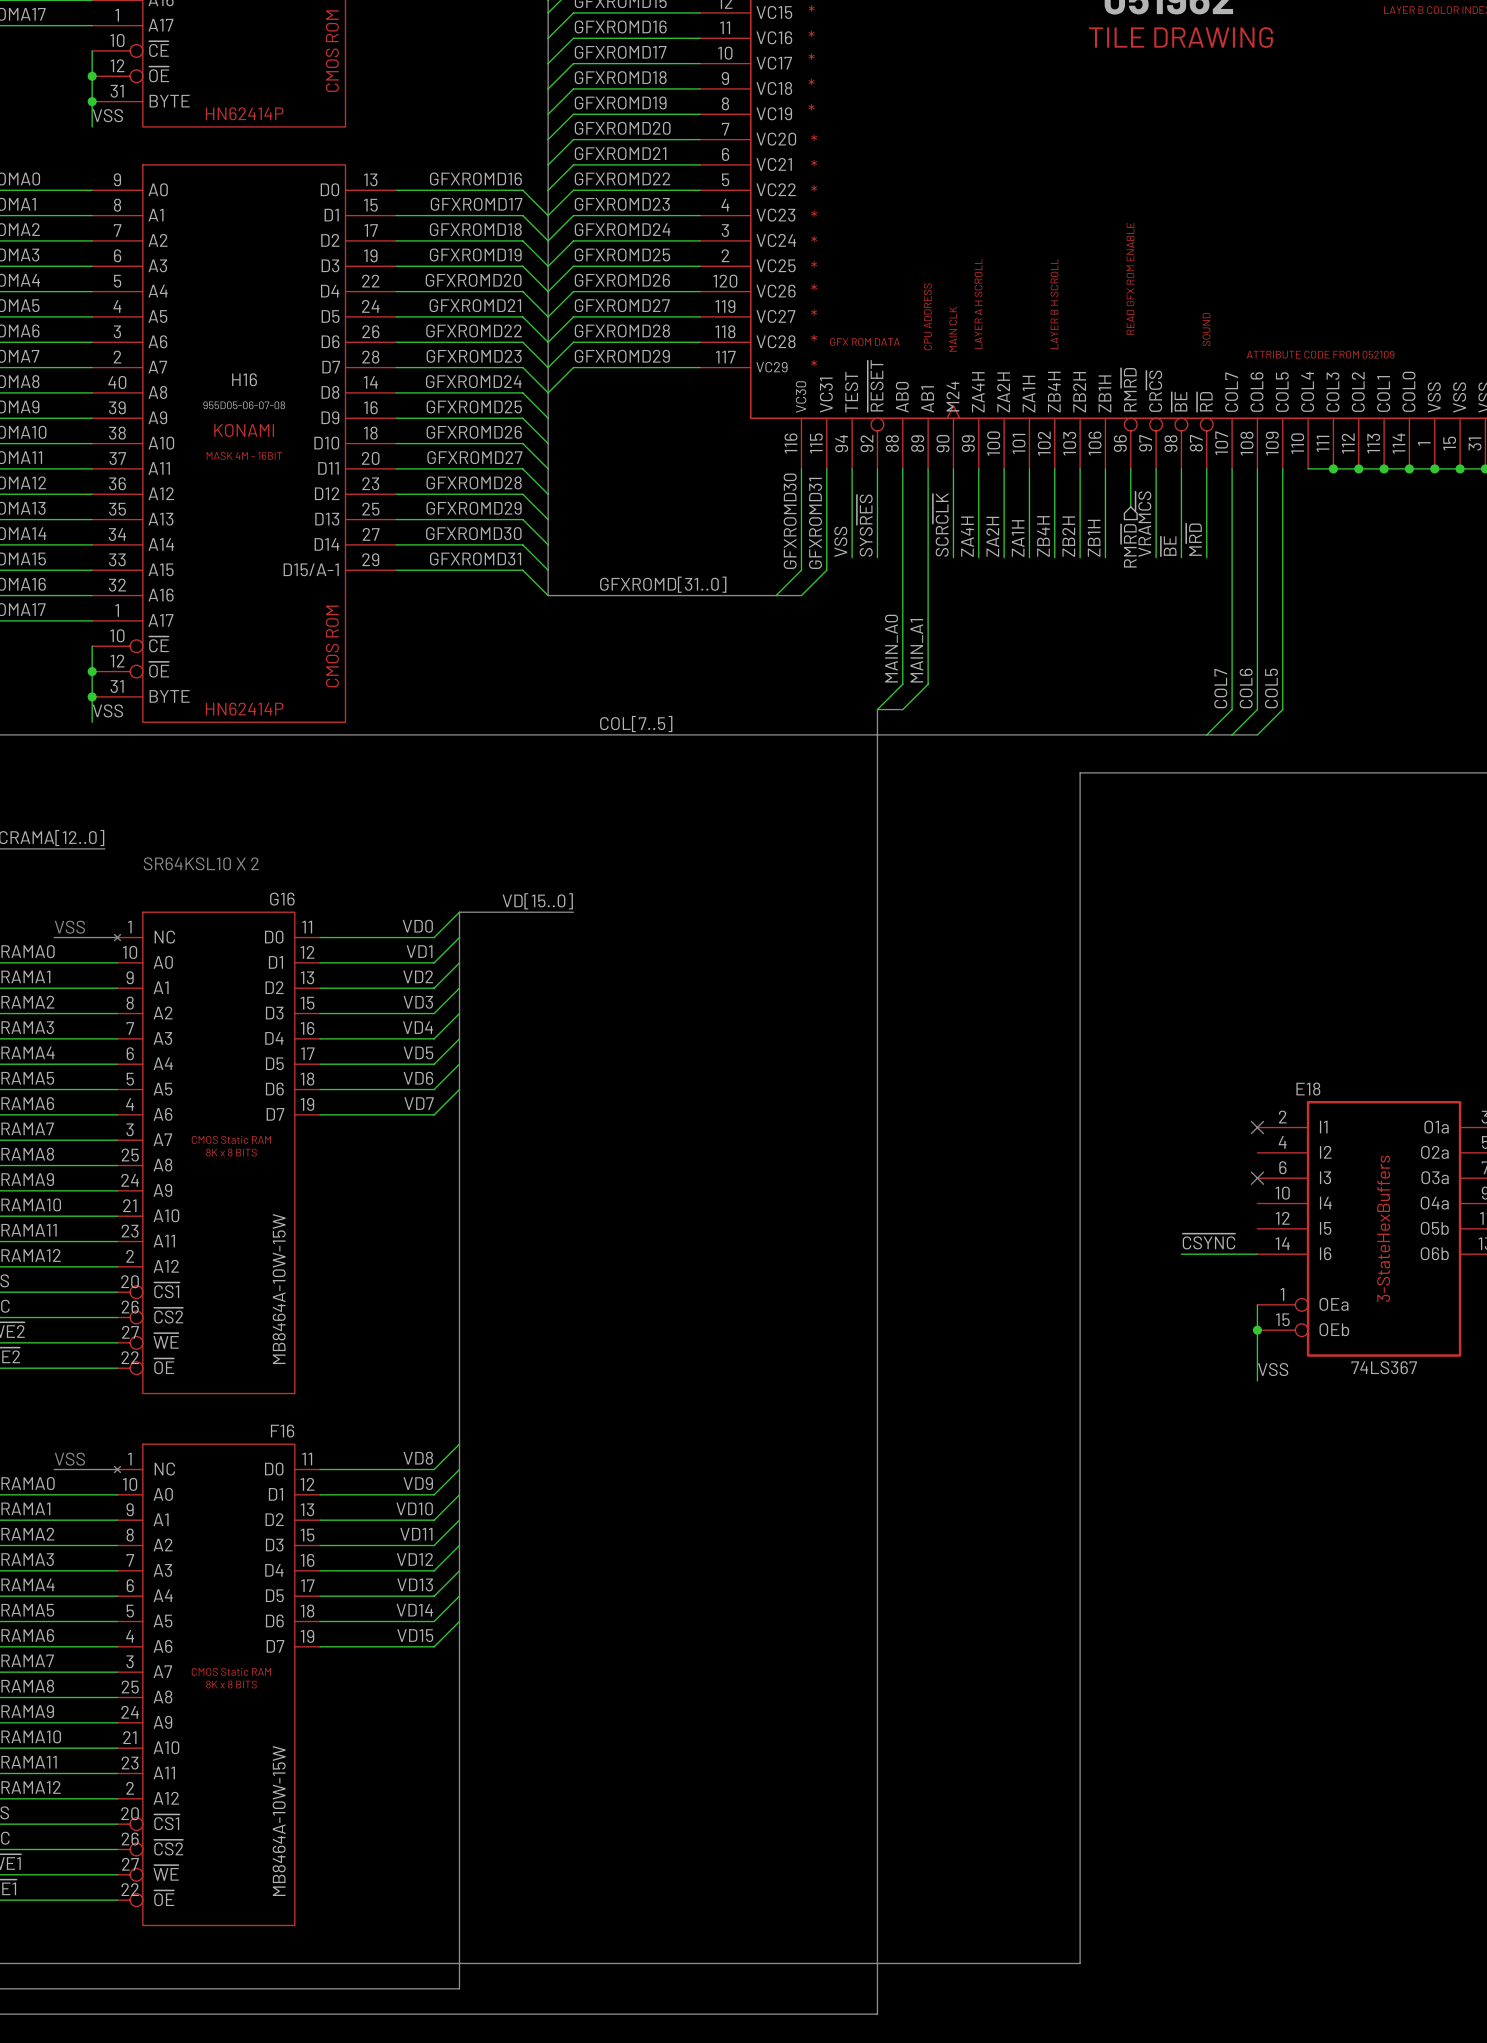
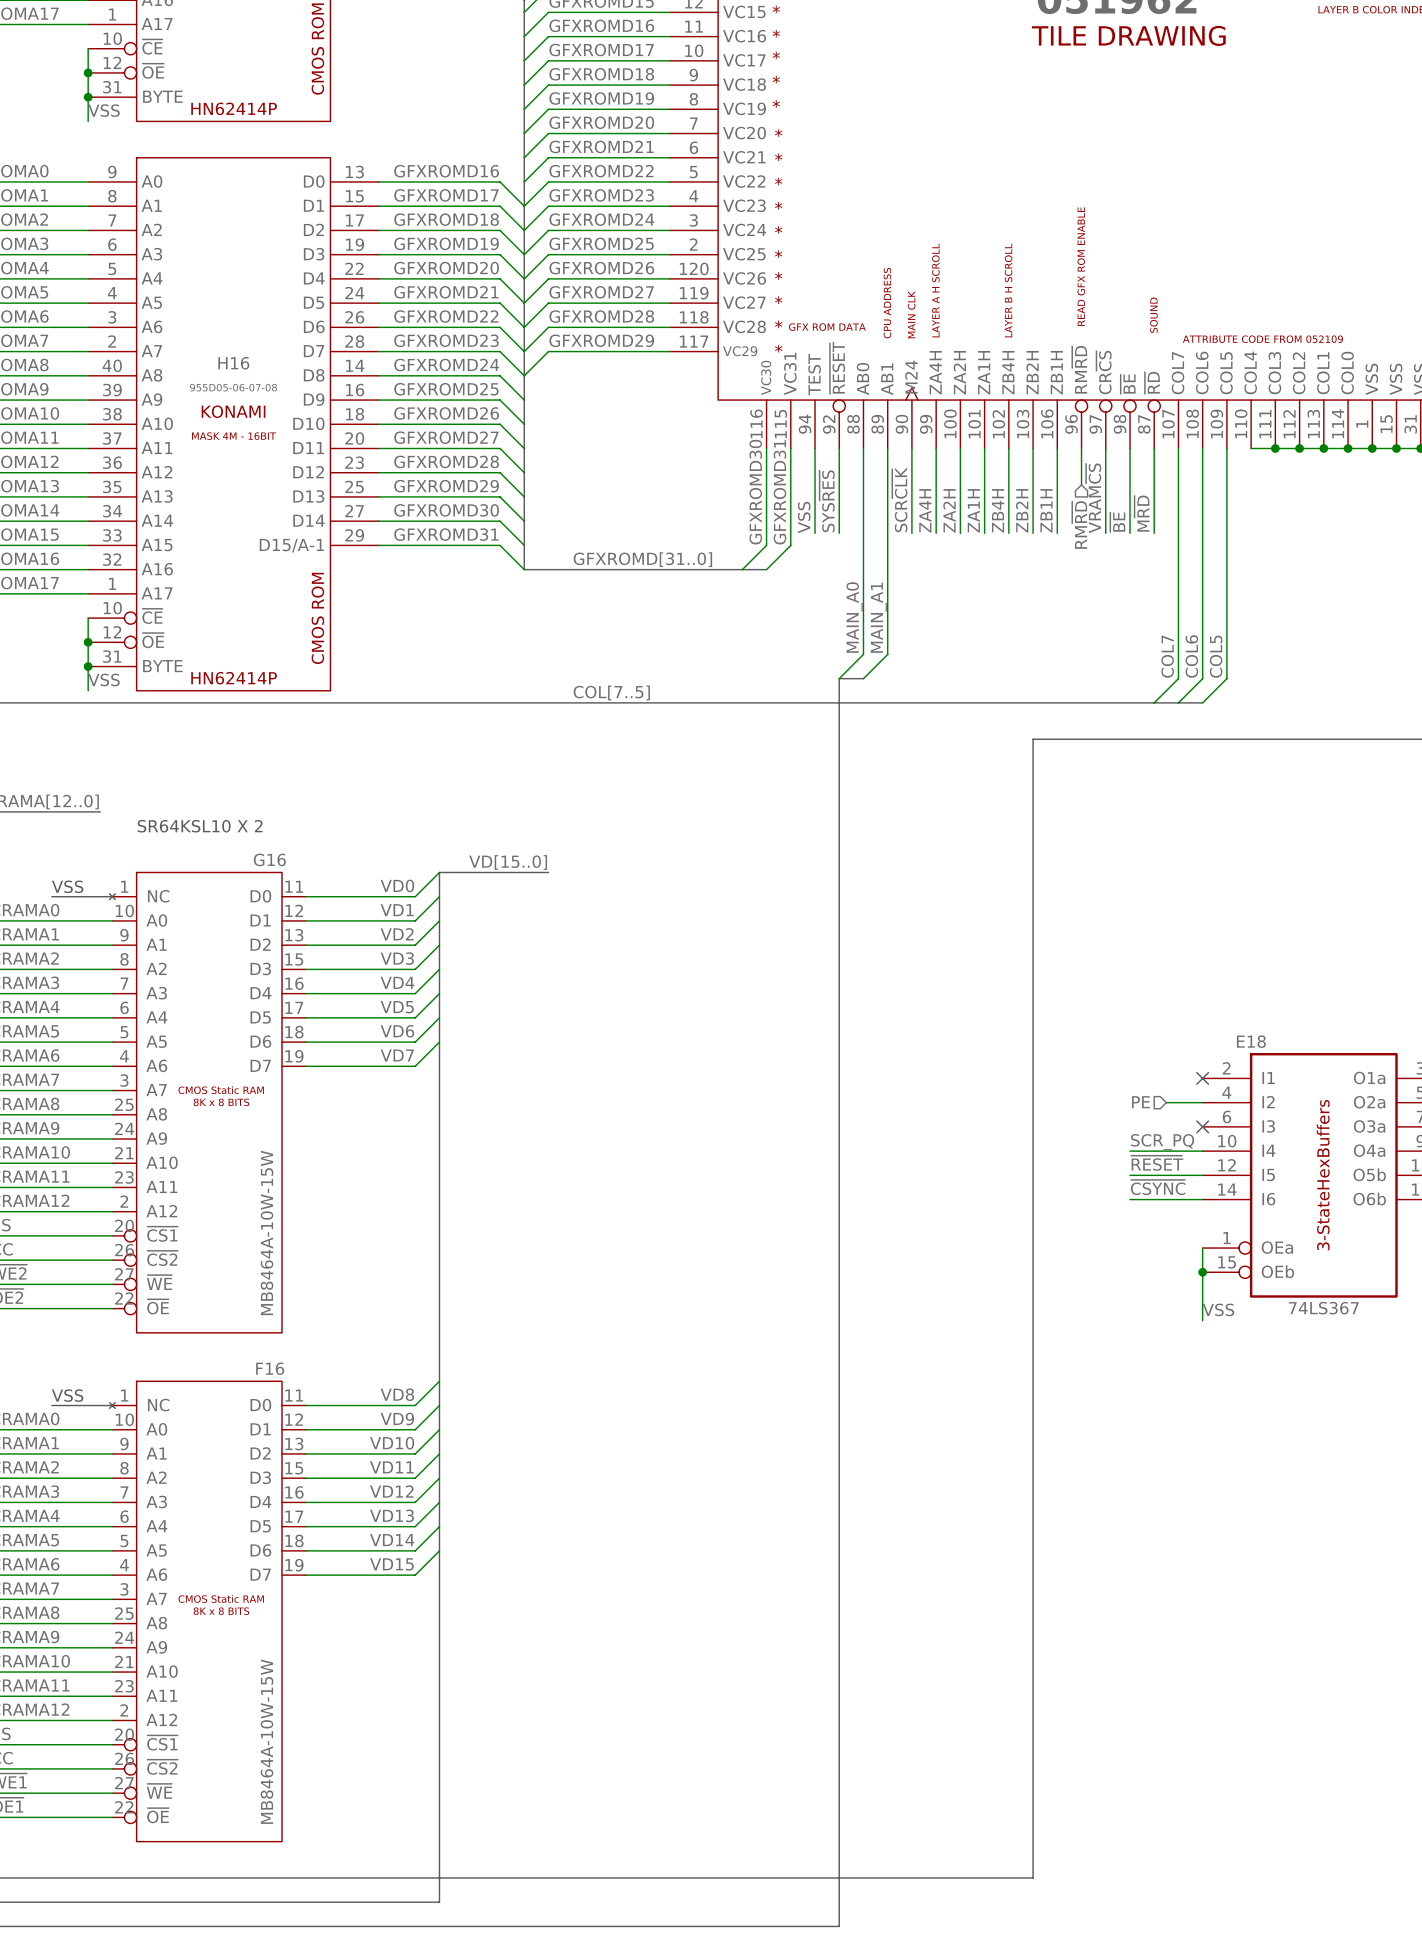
hierarchical label: none -> PE (1140, 1102)
wire: none -> (1166, 1102) (1202, 1102)
label: none -> SCR_PQ (1162, 1142)
wire: none -> (1129, 1151) (1202, 1151)
label: none -> ~{RESET} (1157, 1163)
wire: none -> (1129, 1175) (1202, 1175)

